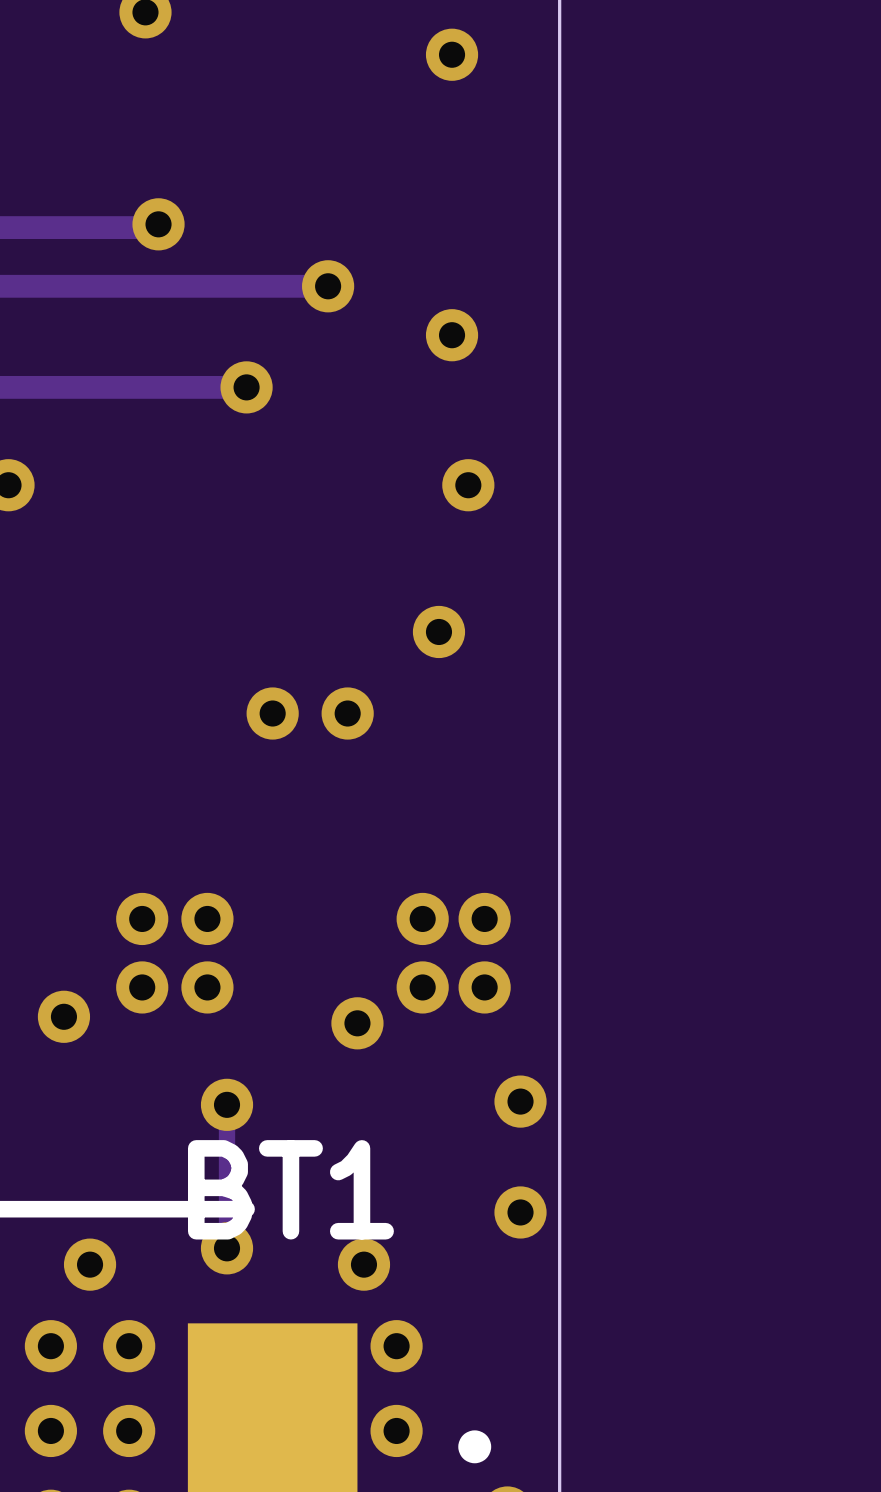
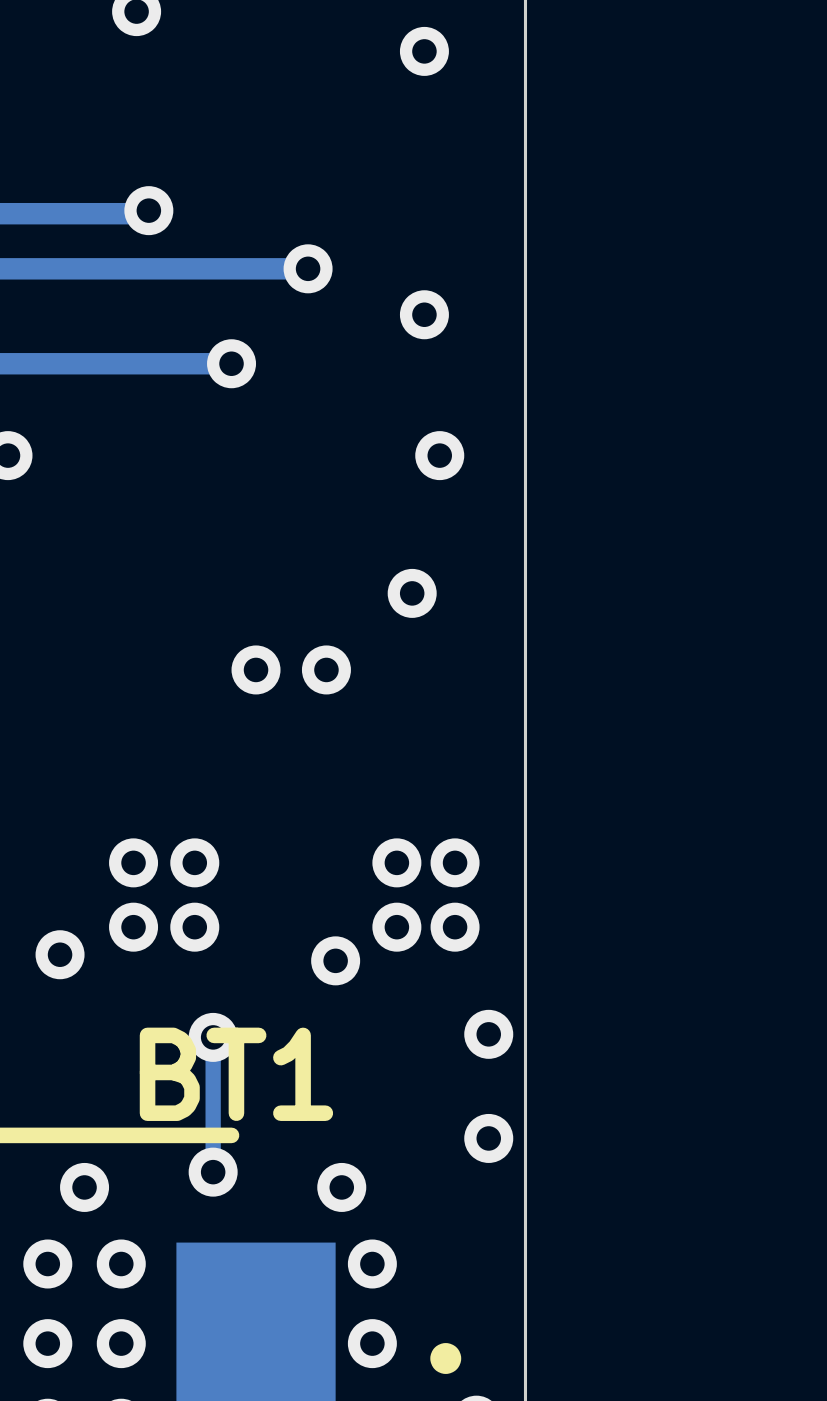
BT1 name position: BT1 (290, 1189) -> BT1 (236, 1074)

